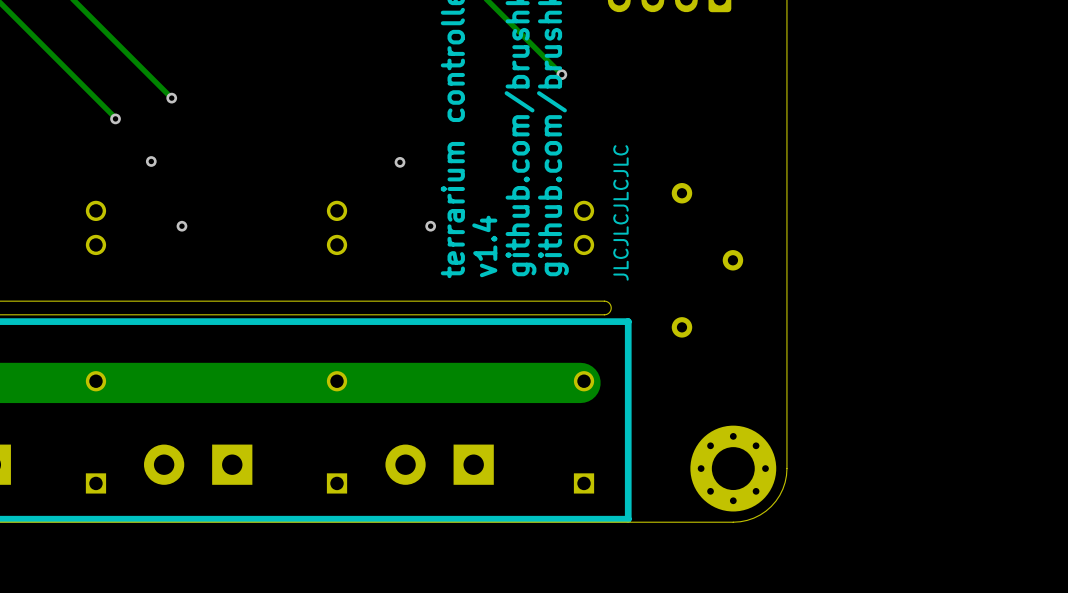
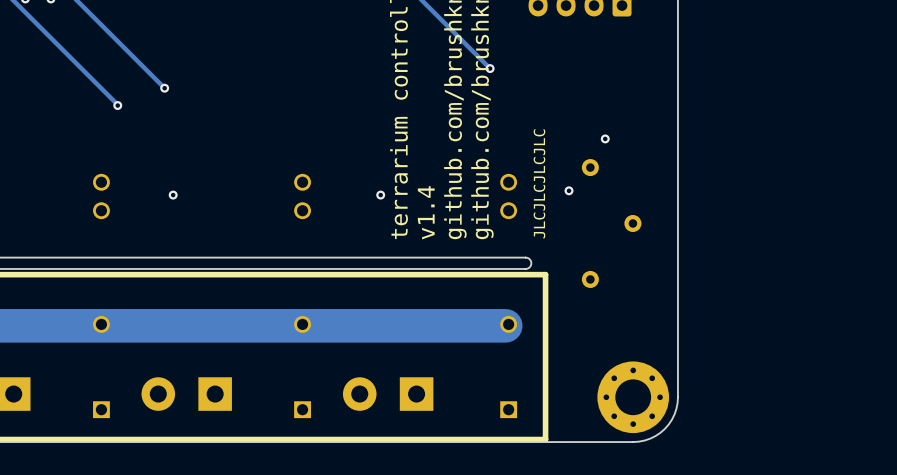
via: none -> (605, 138)
via: (151, 161) -> none
via: (400, 162) -> none
via: none -> (569, 190)

